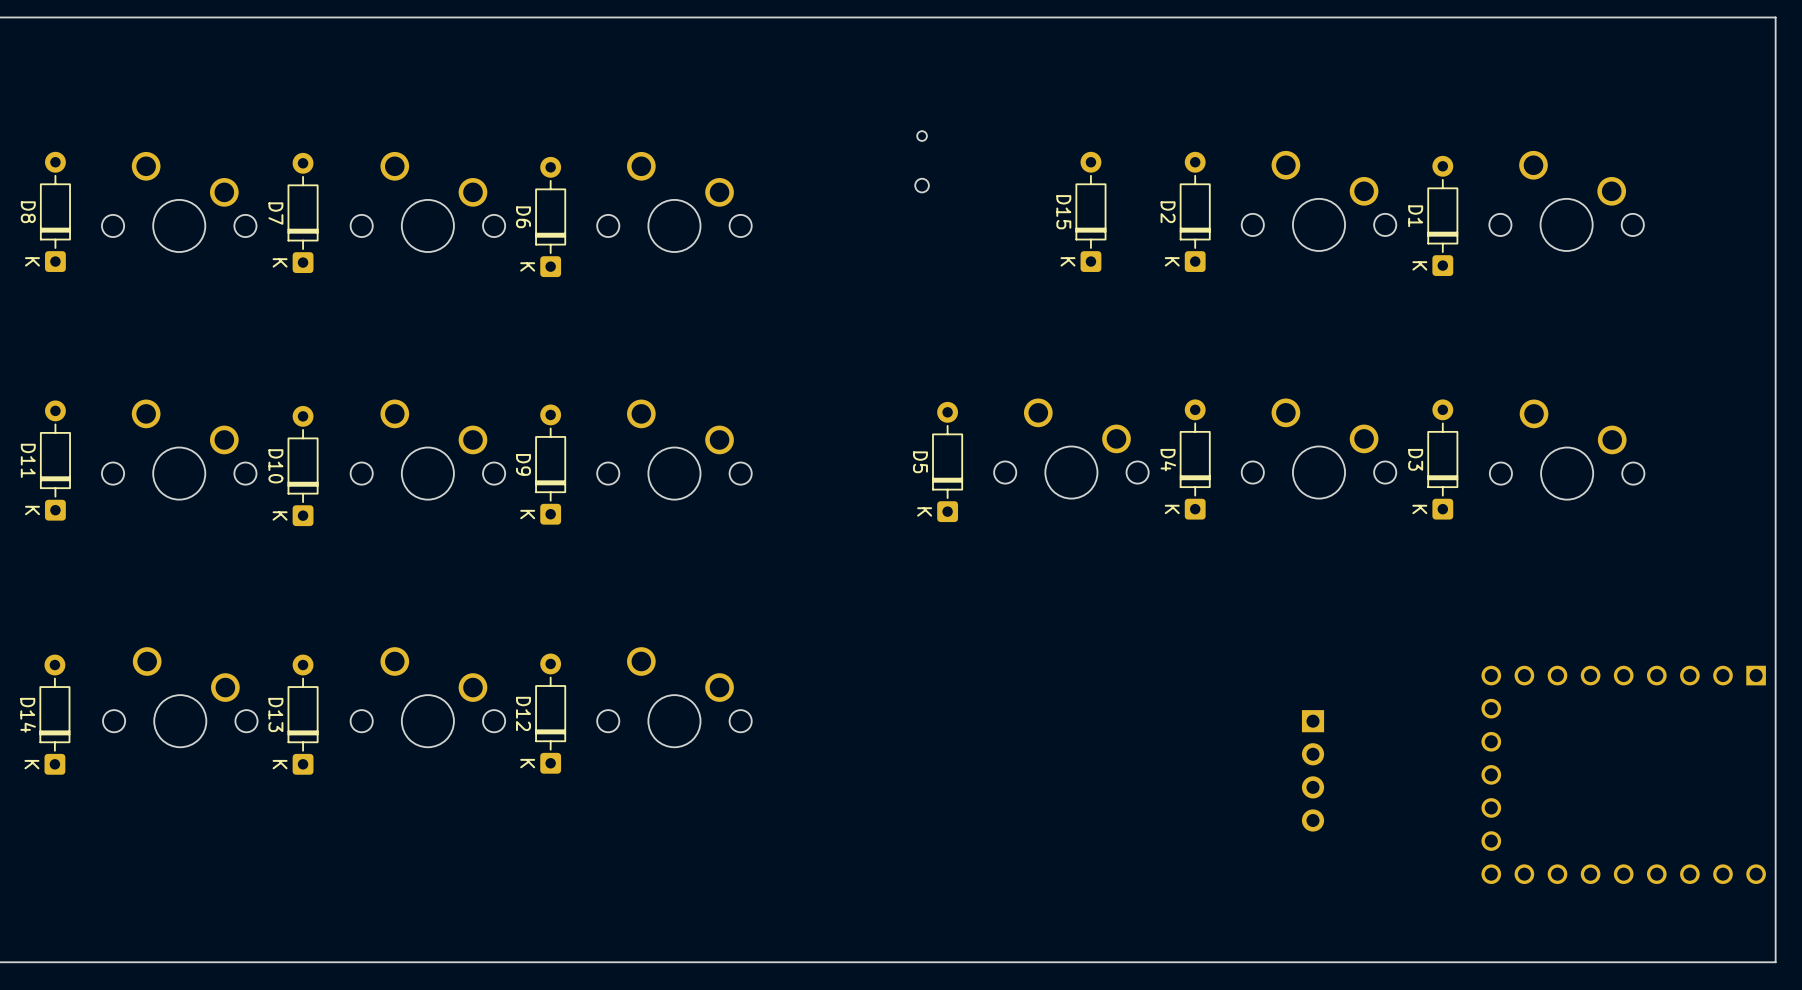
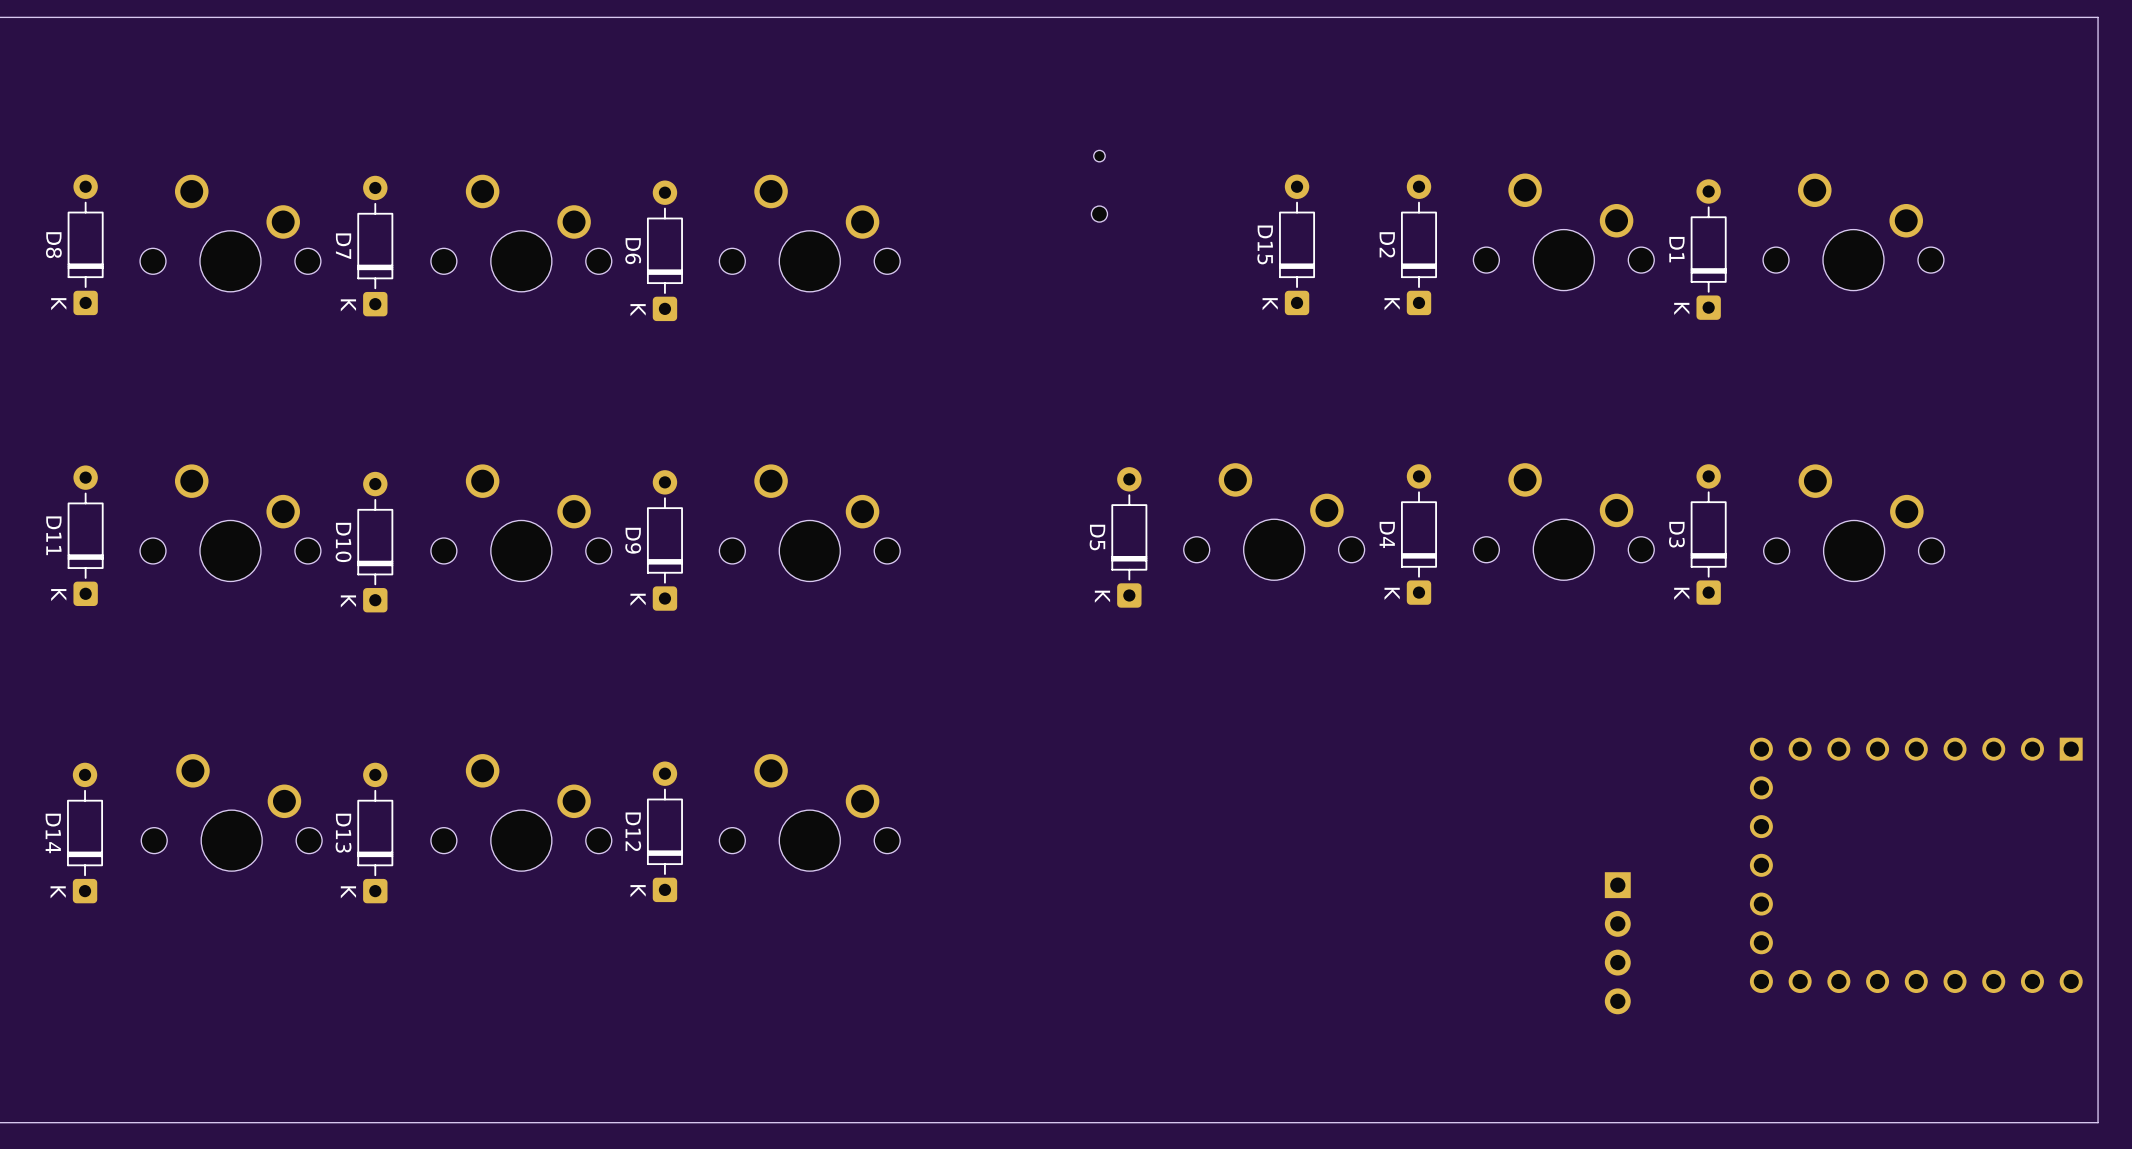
part position: (1313, 770) -> (1617, 943)
part position: (1623, 774) -> (1916, 865)

